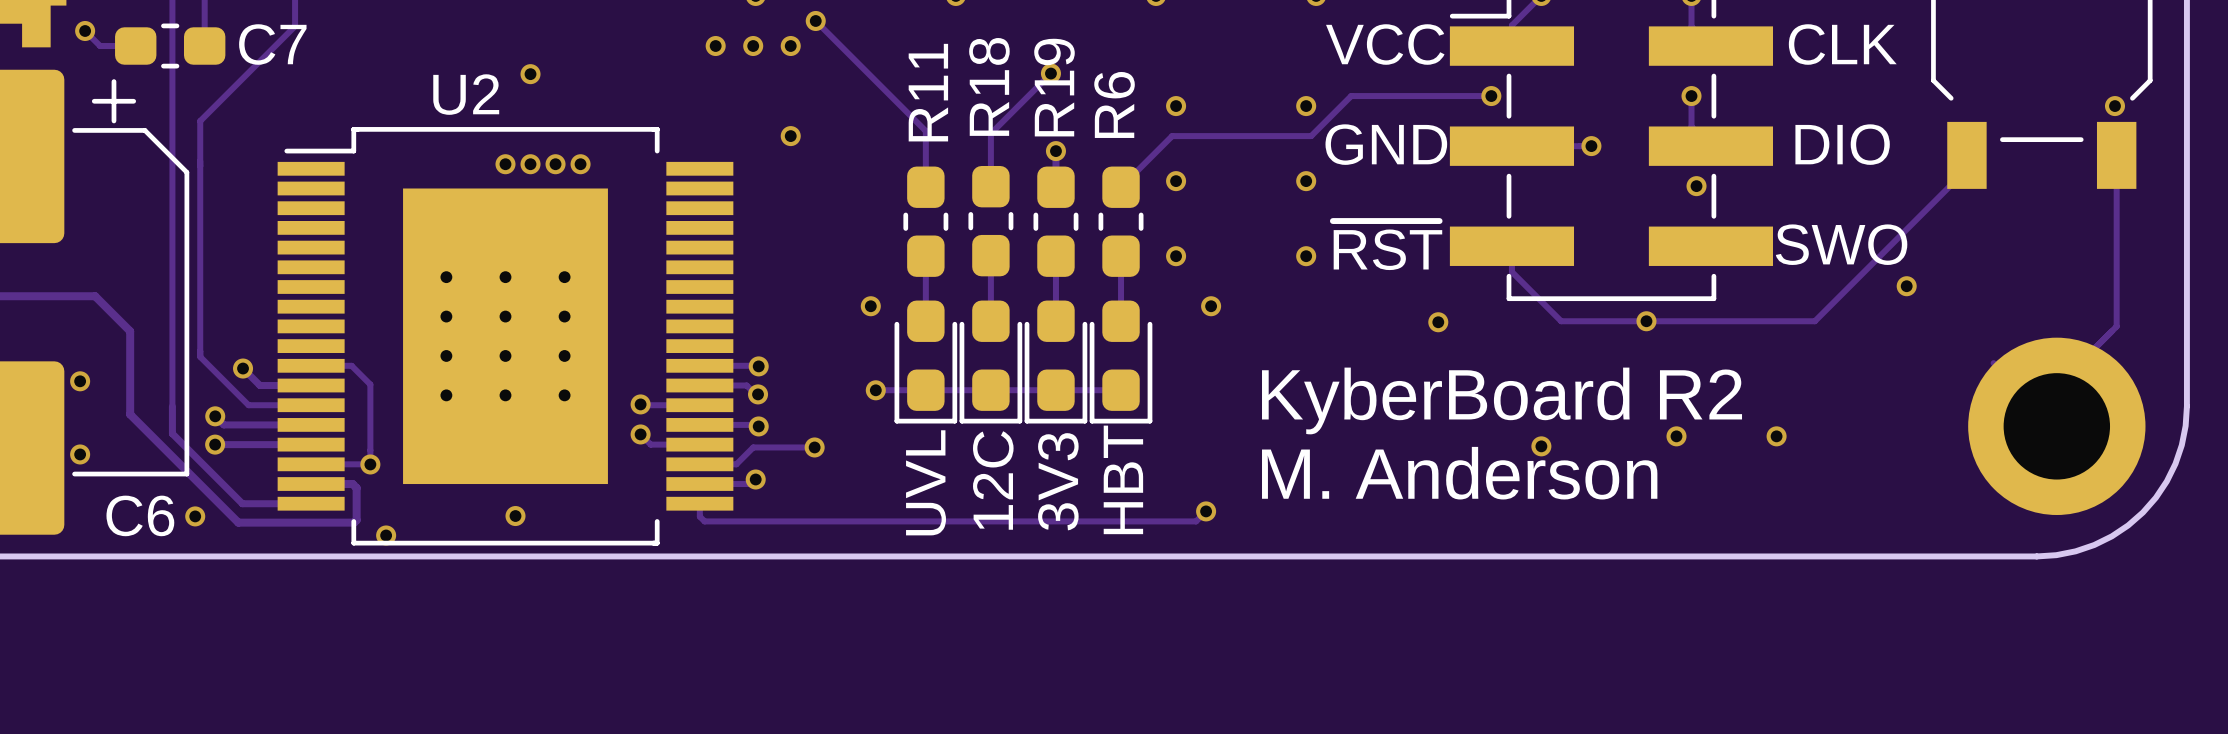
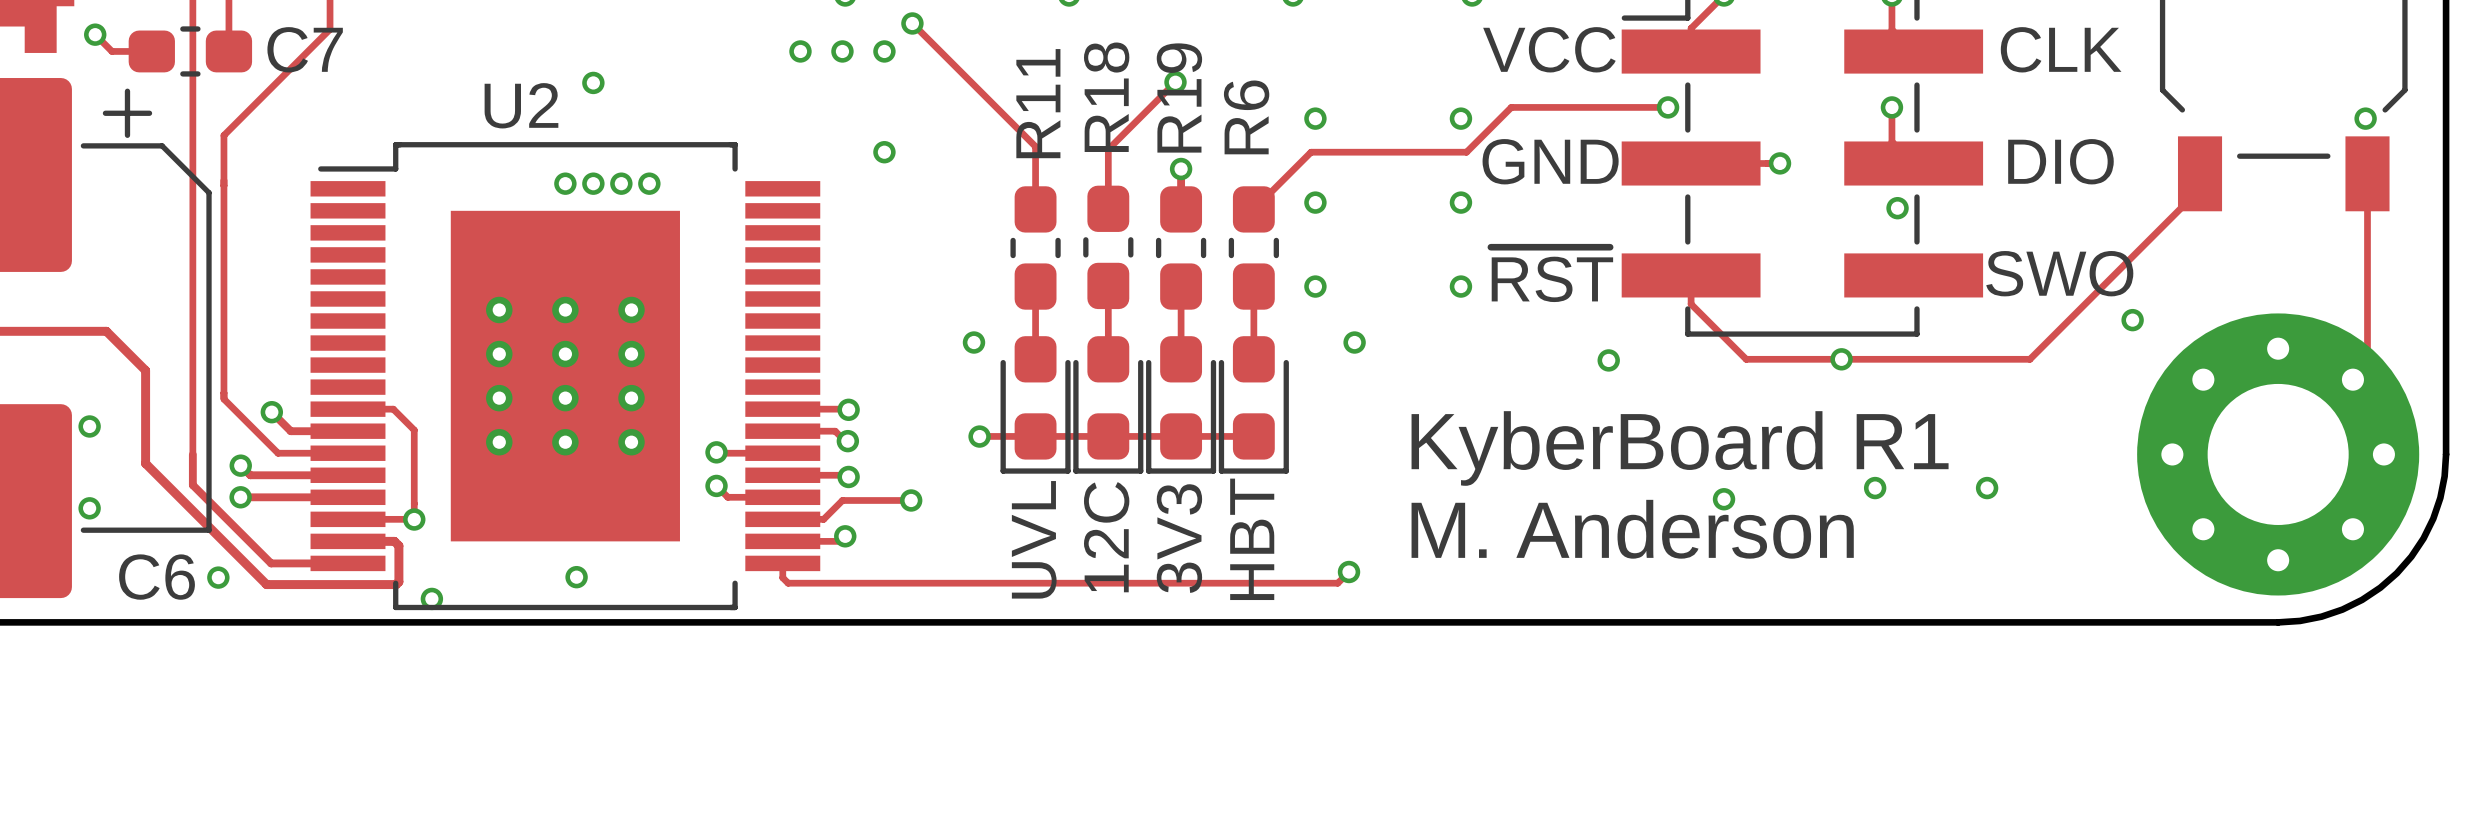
part footprint: [1968, 337, 2146, 515] -> [2137, 313, 2420, 596]
text: KyberBoard R2 (1502, 400) -> KyberBoard R1 (1680, 448)
text: HBT (1123, 479) -> none
12C name: none -> 12C (1106, 537)
text: 12C (993, 480) -> none
3V3 name: none -> 3V3 (1179, 538)
text: 3V3 (1058, 481) -> none
UVL name: none -> UVL (1034, 539)
text: UVL (926, 482) -> none
HBT name: none -> HBT (1252, 539)

